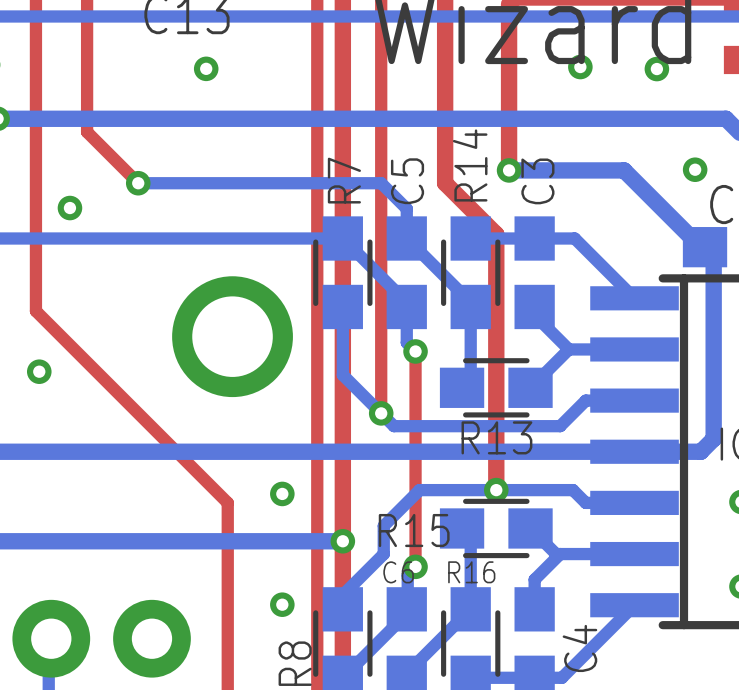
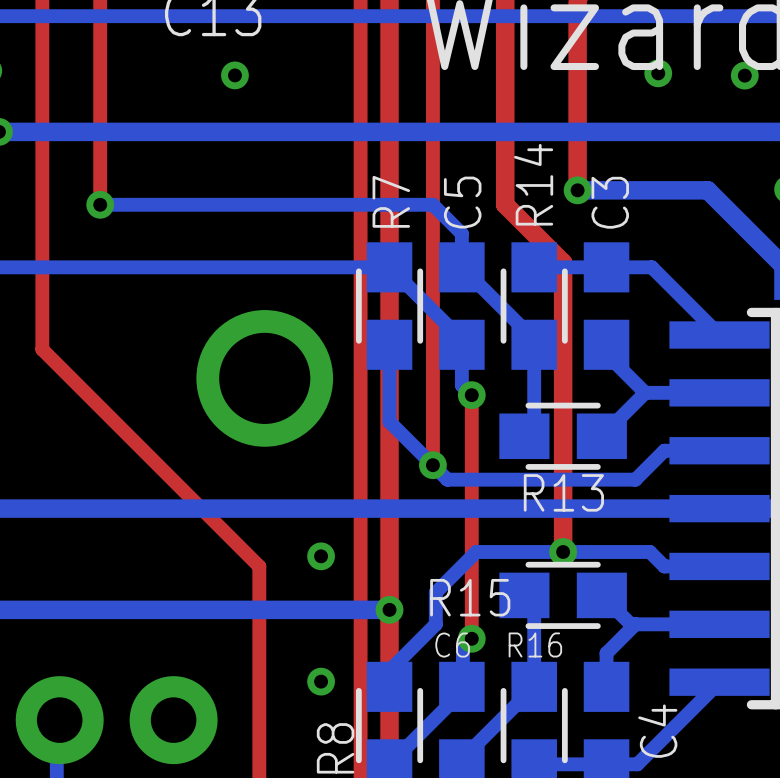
top track: (87, 132) (138, 183) -> (100, 146) (100, 204)
via: none -> (100, 204)
bottom track: none -> (158, 204) (100, 204)
via: (138, 183) -> none
via: (69, 208) -> none
via: (39, 371) -> none

